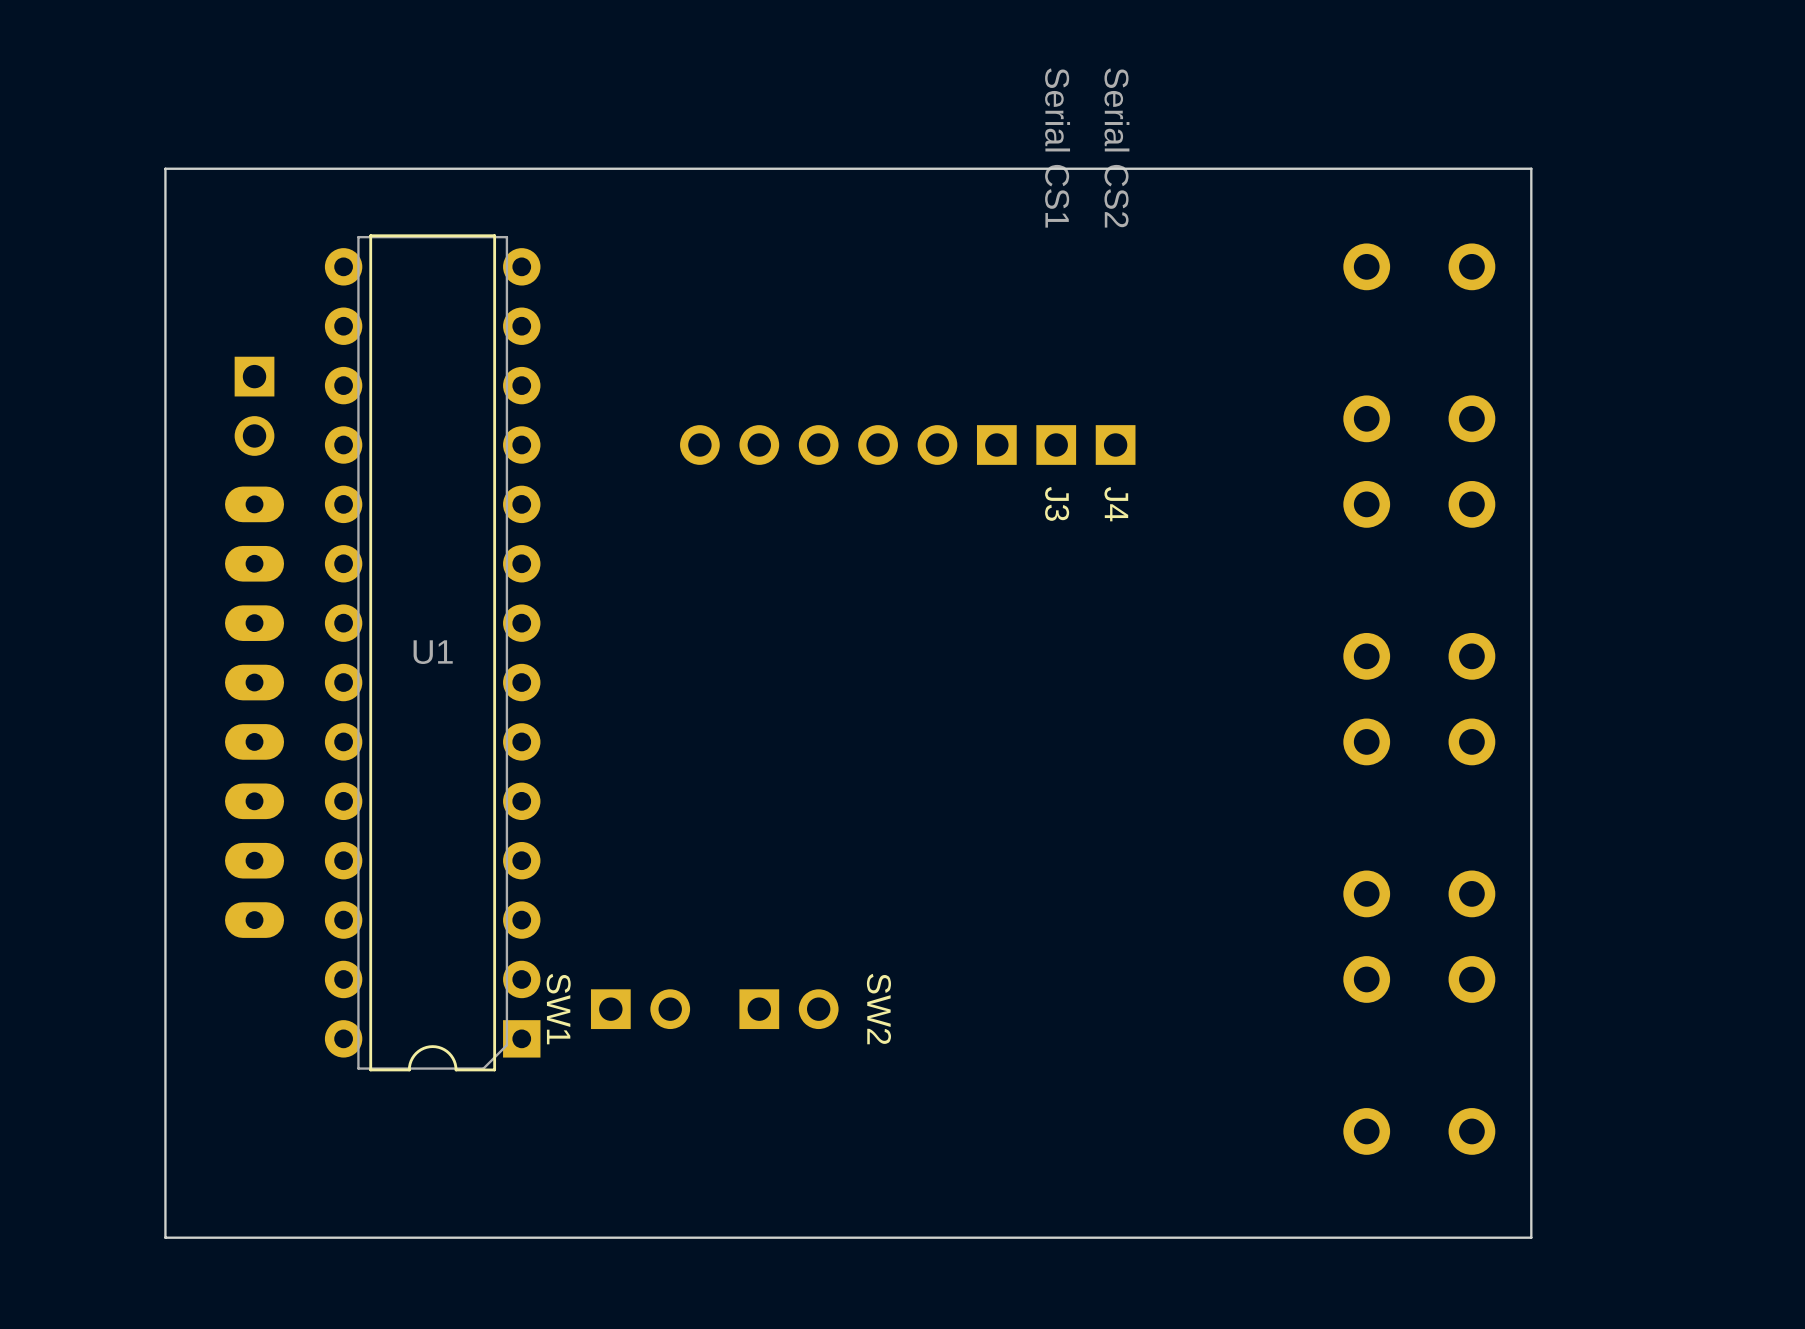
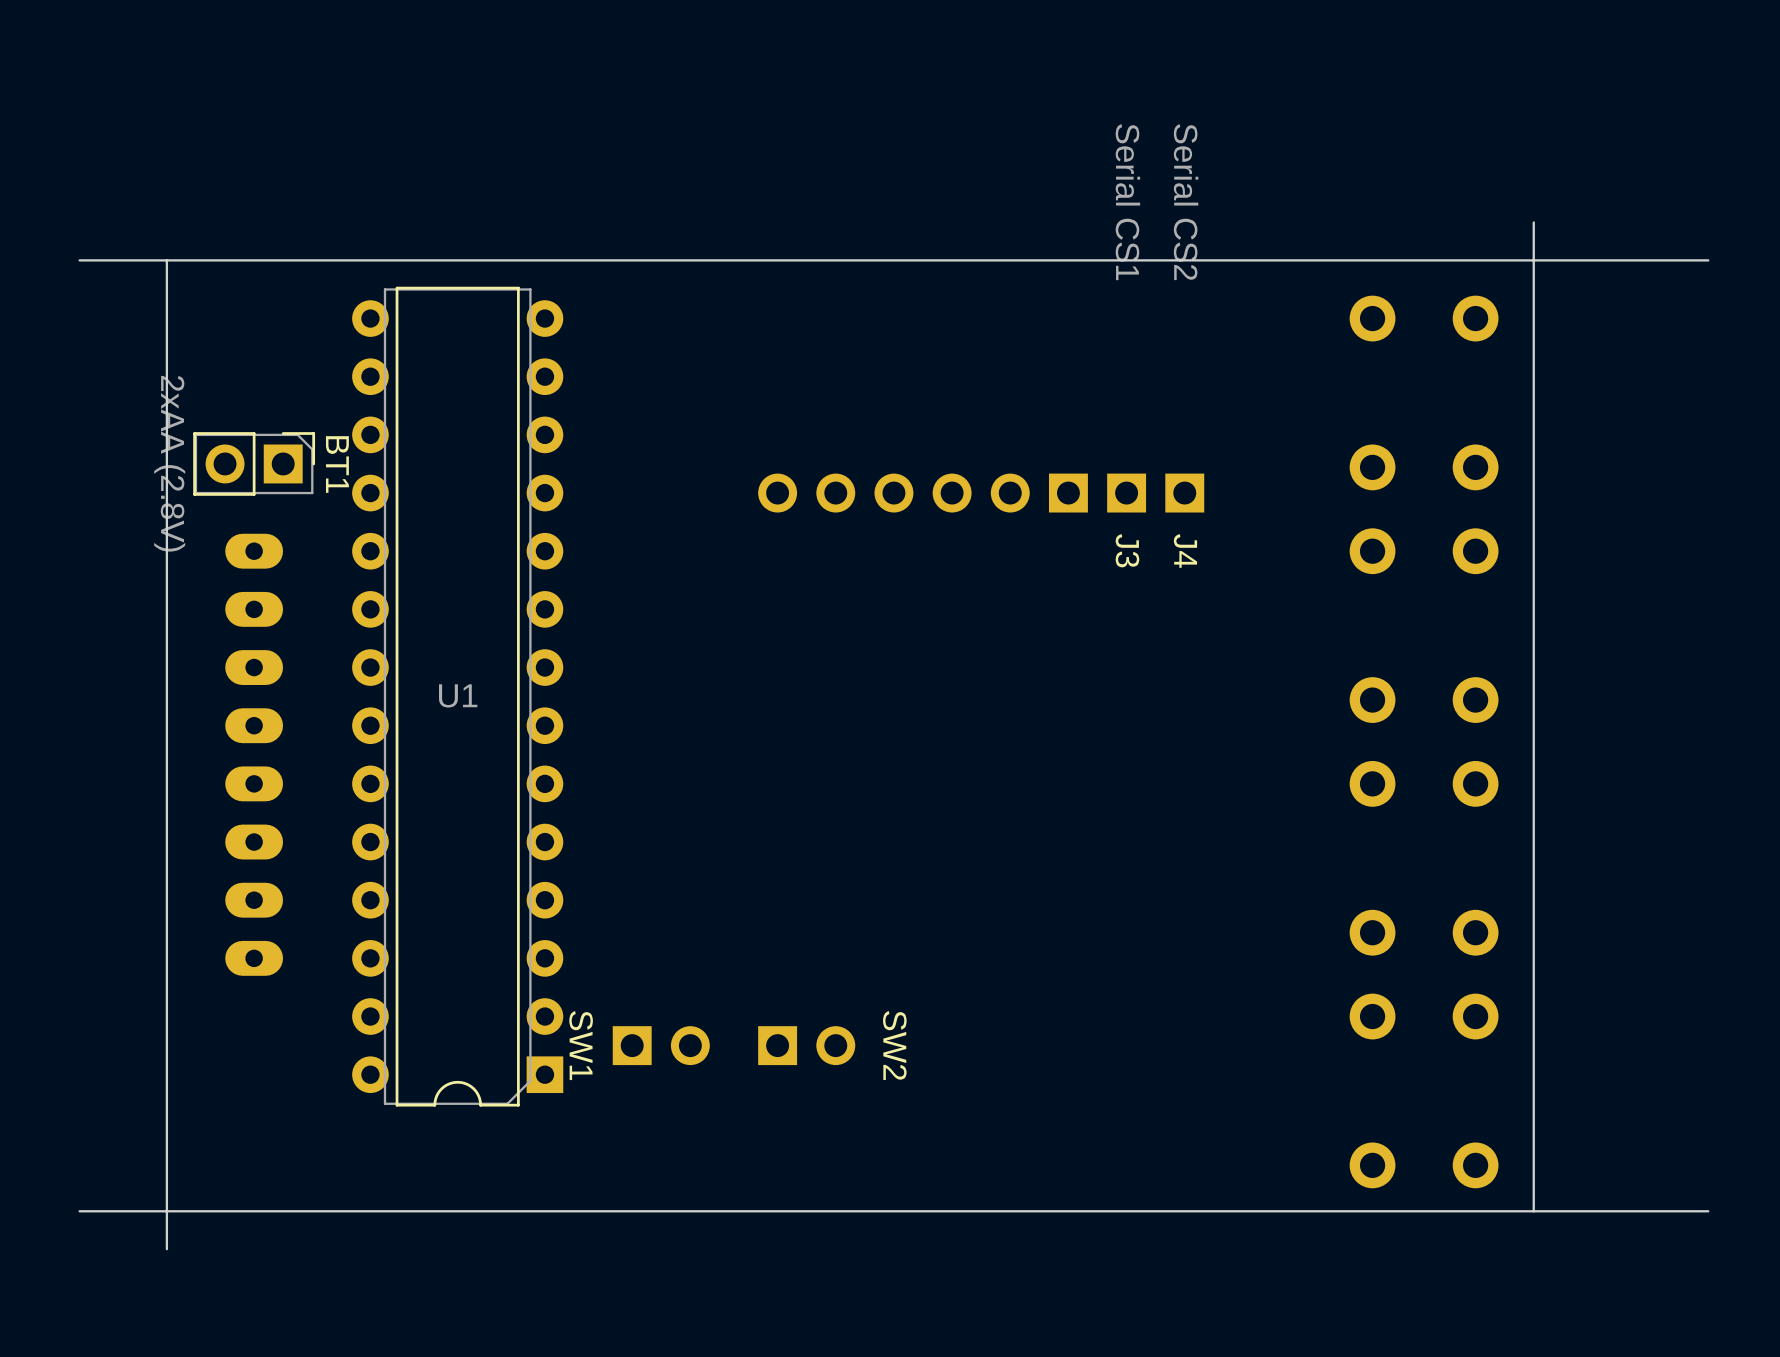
J4 value: Serial CS2 (1116, 147) -> Serial CS1 (1127, 202)
board edge: (1531, 168) (165, 168) (165, 1237) (1531, 1237) (1531, 1178) -> none
board edge: none -> (166, 260) (166, 1249)
board edge: none -> (1708, 260) (79, 260)
BT1 side: top (254, 406) -> bottom (254, 463)
part position: (848, 445) -> (923, 493)
J3: Serial CS1 (1056, 445) -> none
J4: none -> Serial CS2 (1184, 493)
J4 name: J4 (1116, 504) -> J3 (1127, 550)
part position: (254, 712) -> (254, 754)
board edge: none -> (1708, 1211) (79, 1211)

